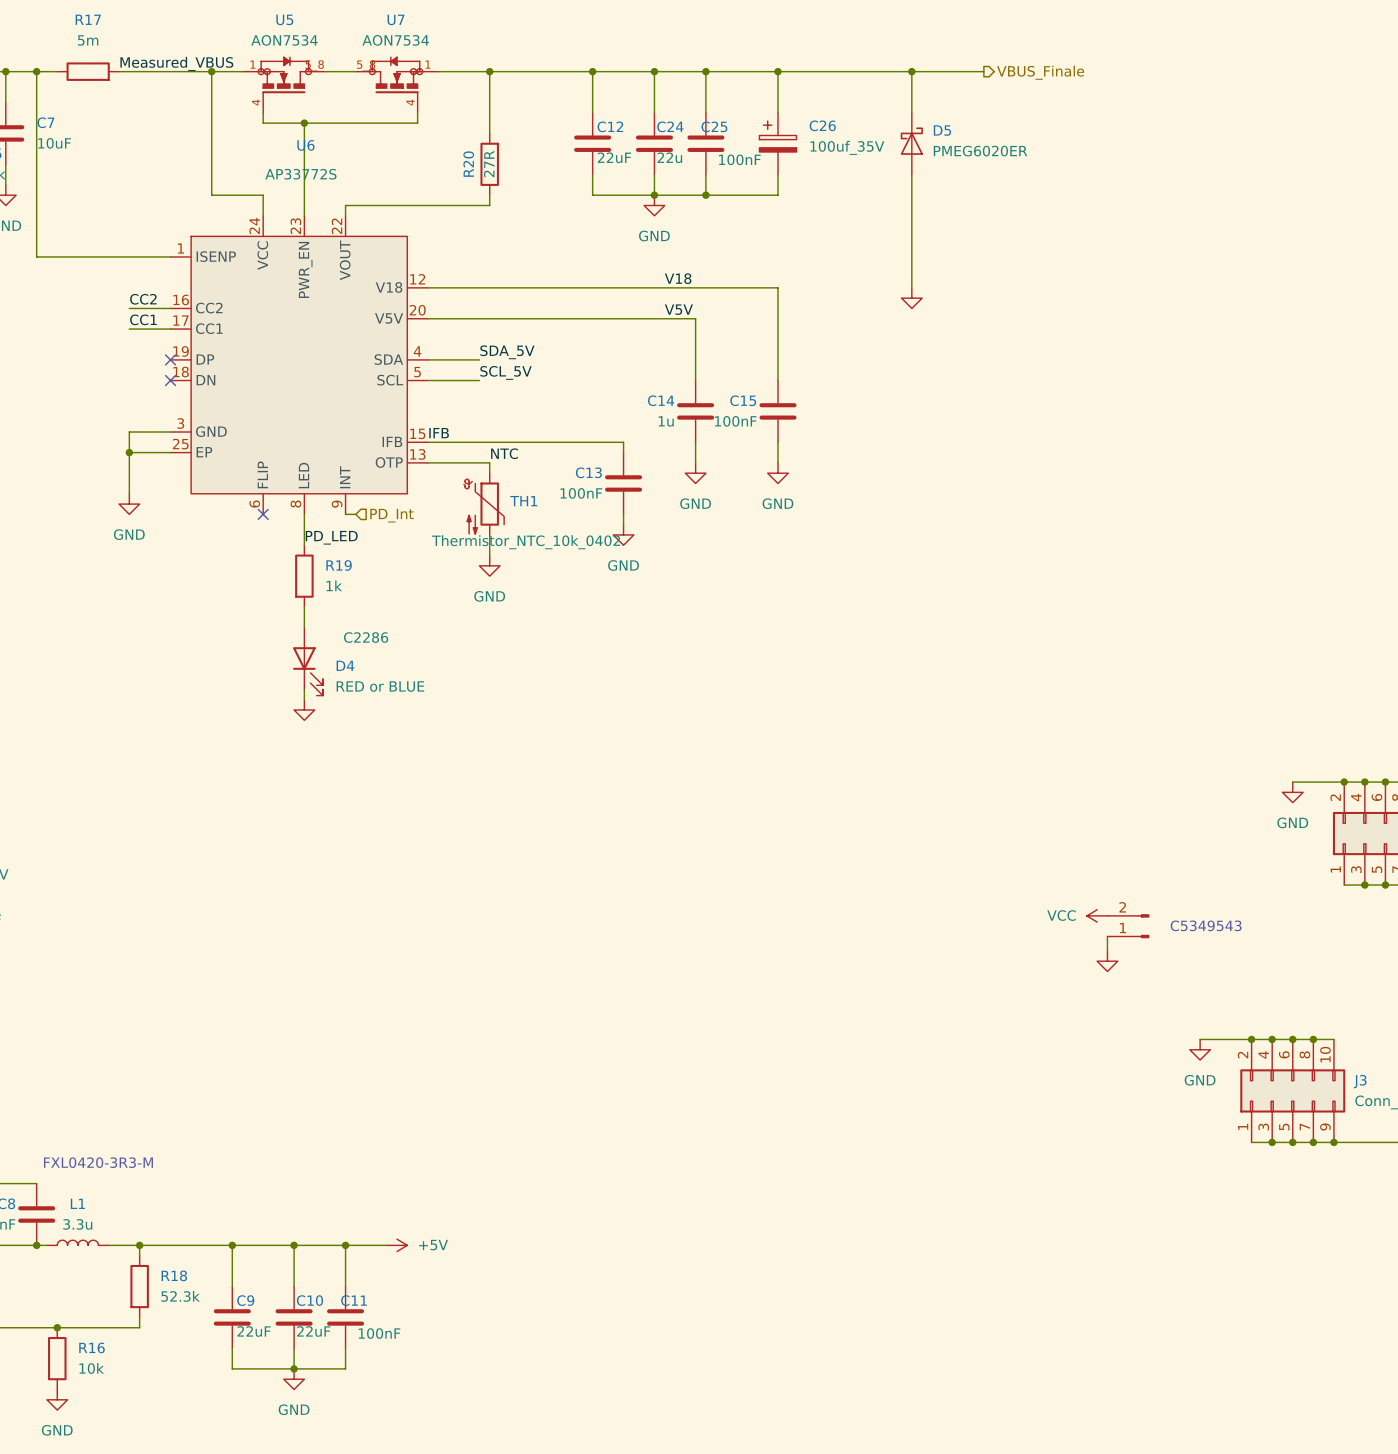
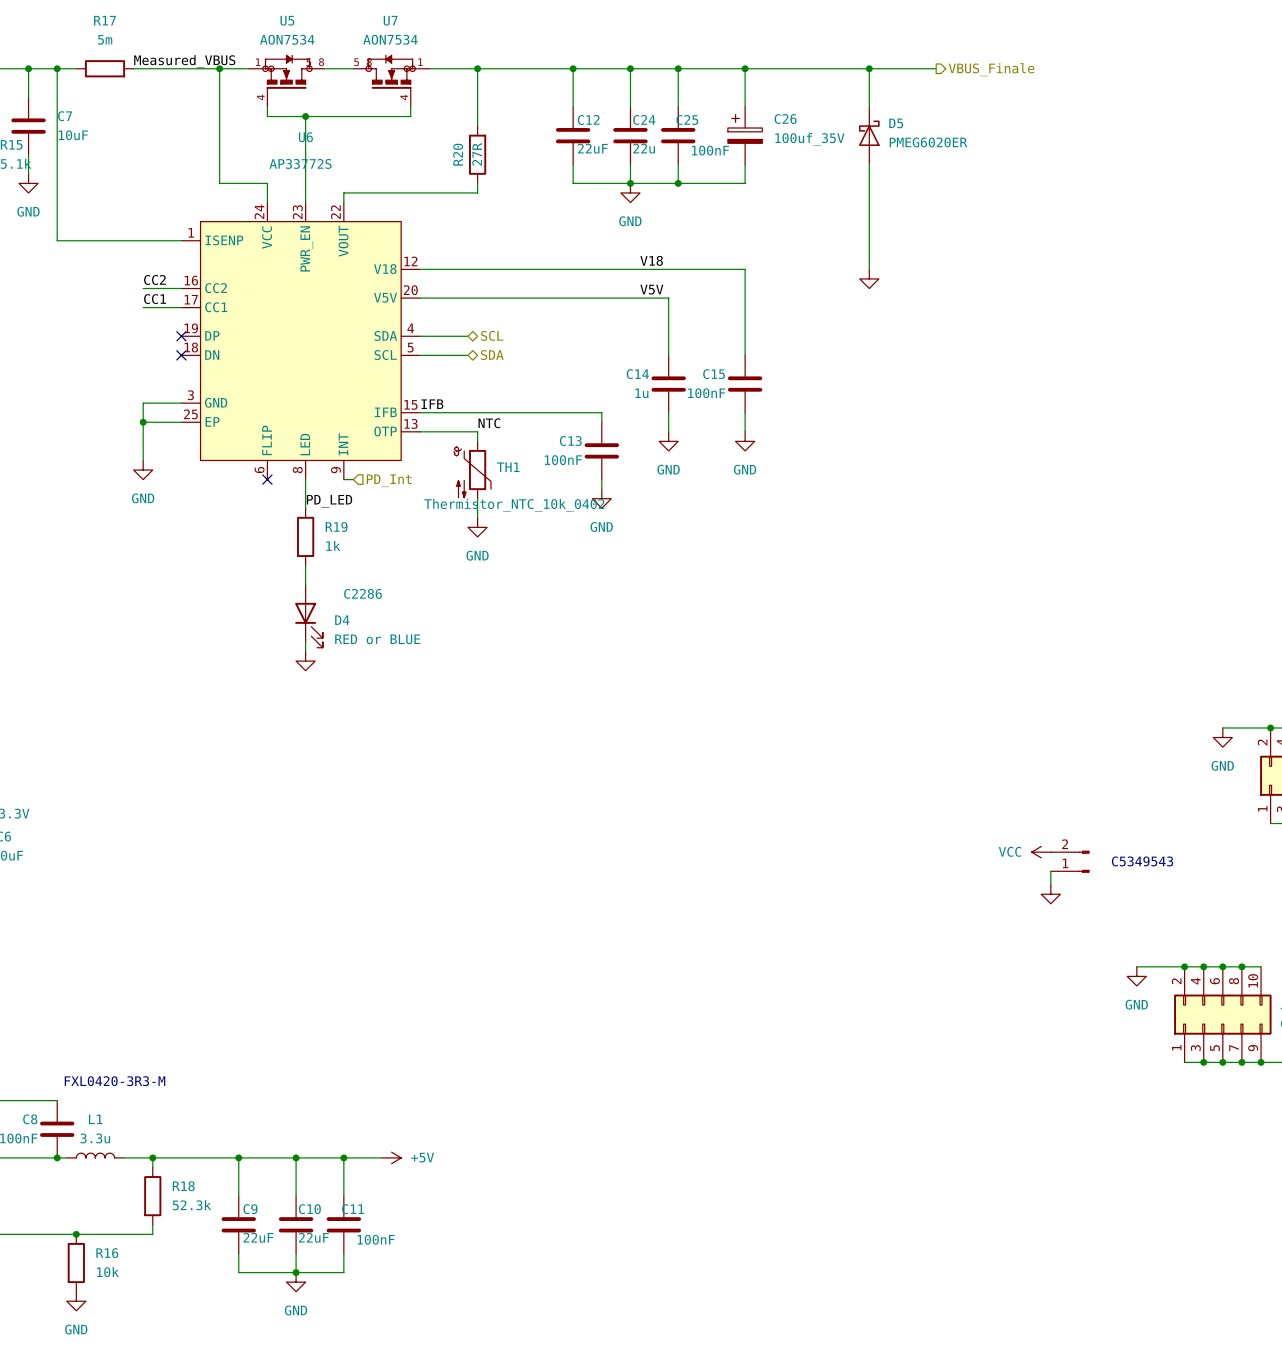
label: SDA_5V (507, 352) -> none
hierarchical label: none -> SCL (492, 335)
label: SCL_5V (506, 372) -> none
hierarchical label: none -> SDA (492, 355)

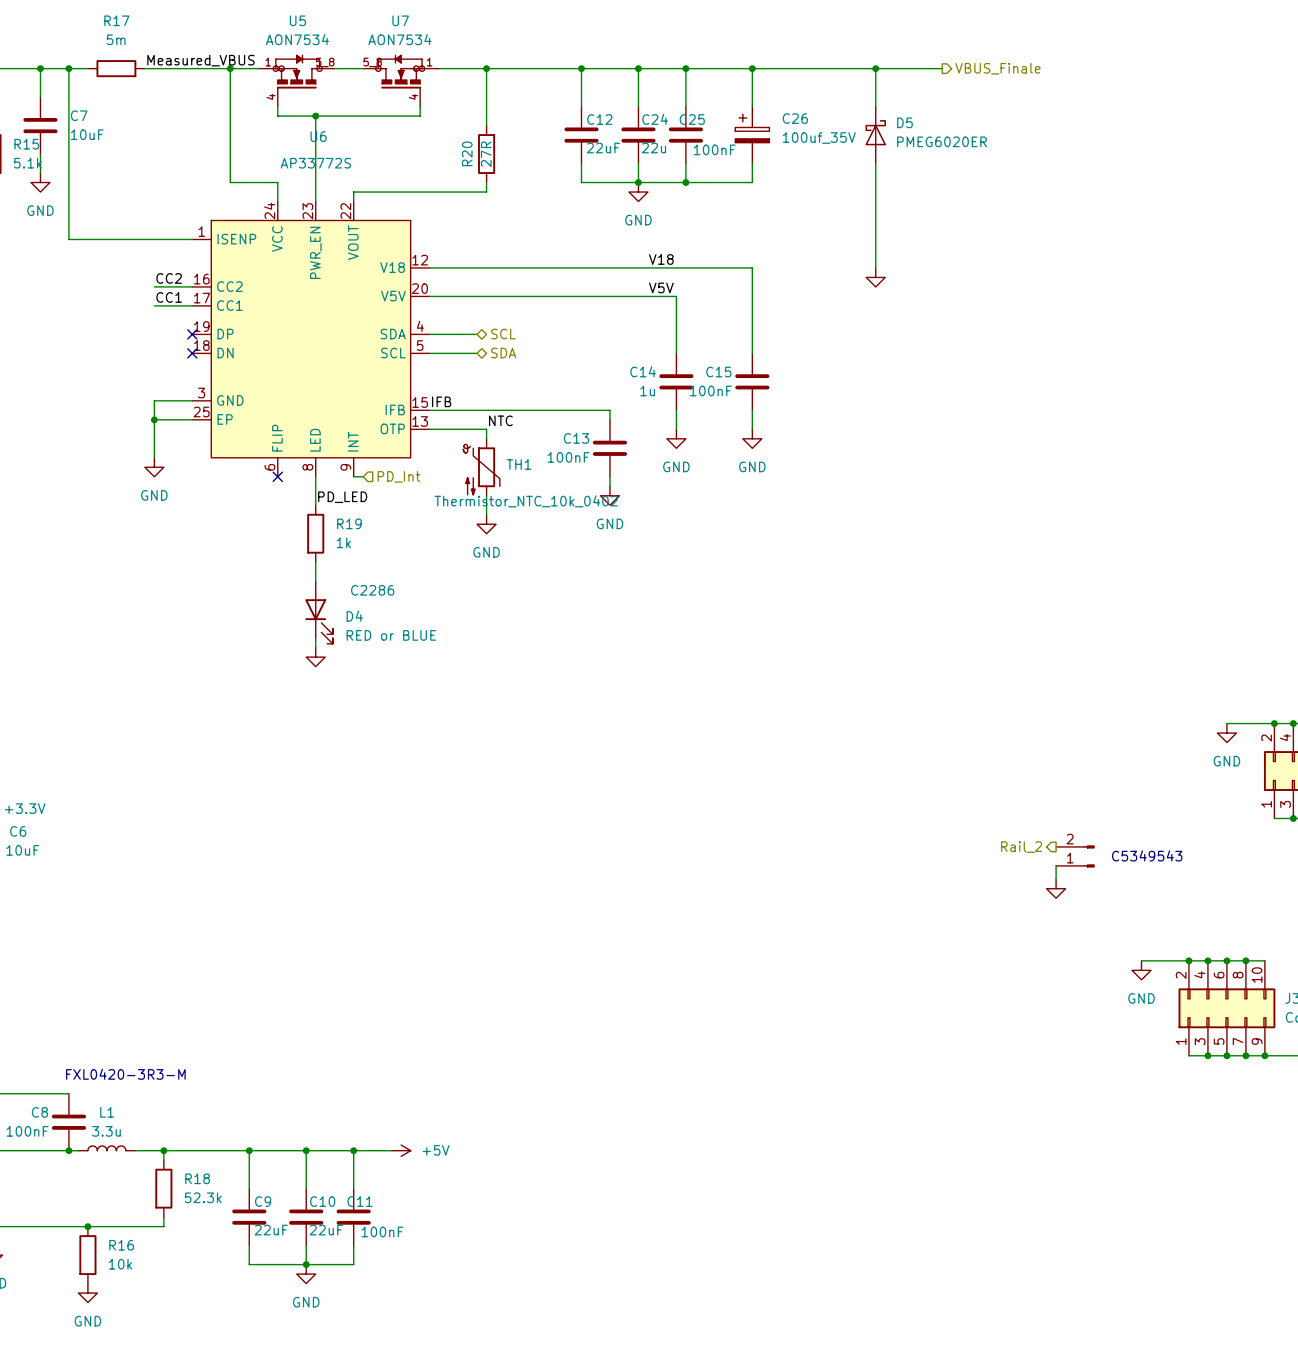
power symbol: VCC (1041, 852) -> none
hierarchical label: none -> Rail_2 (1021, 847)

